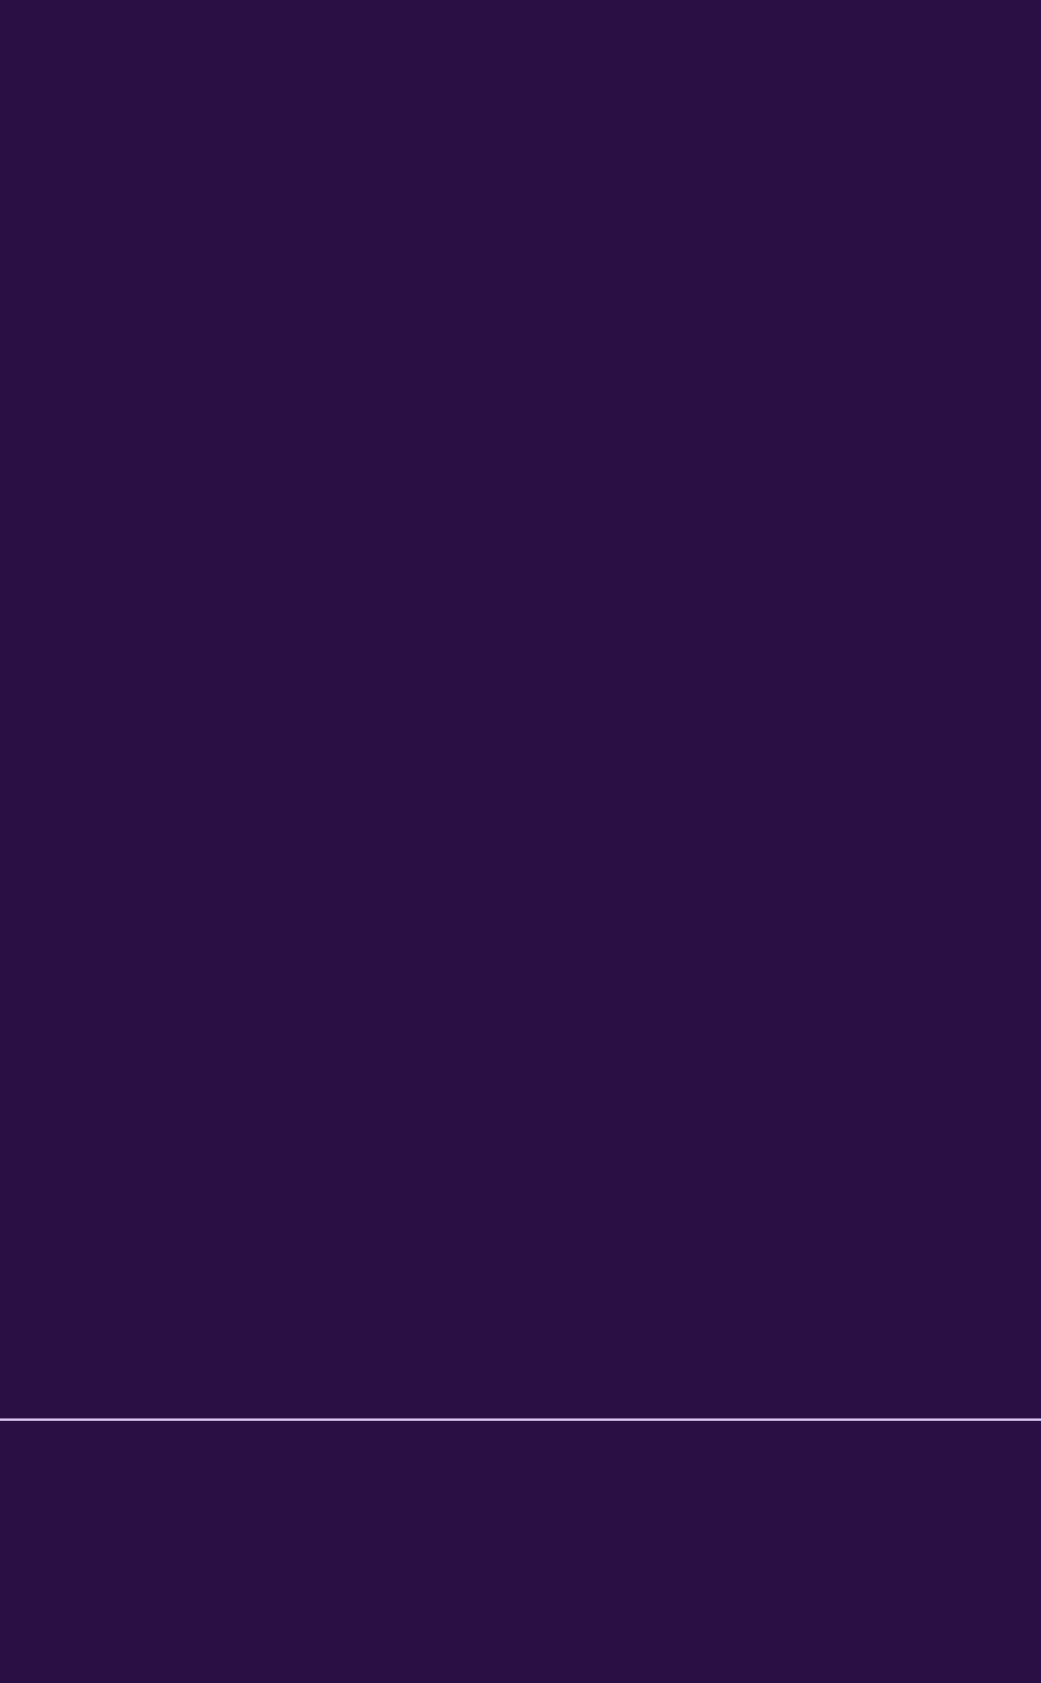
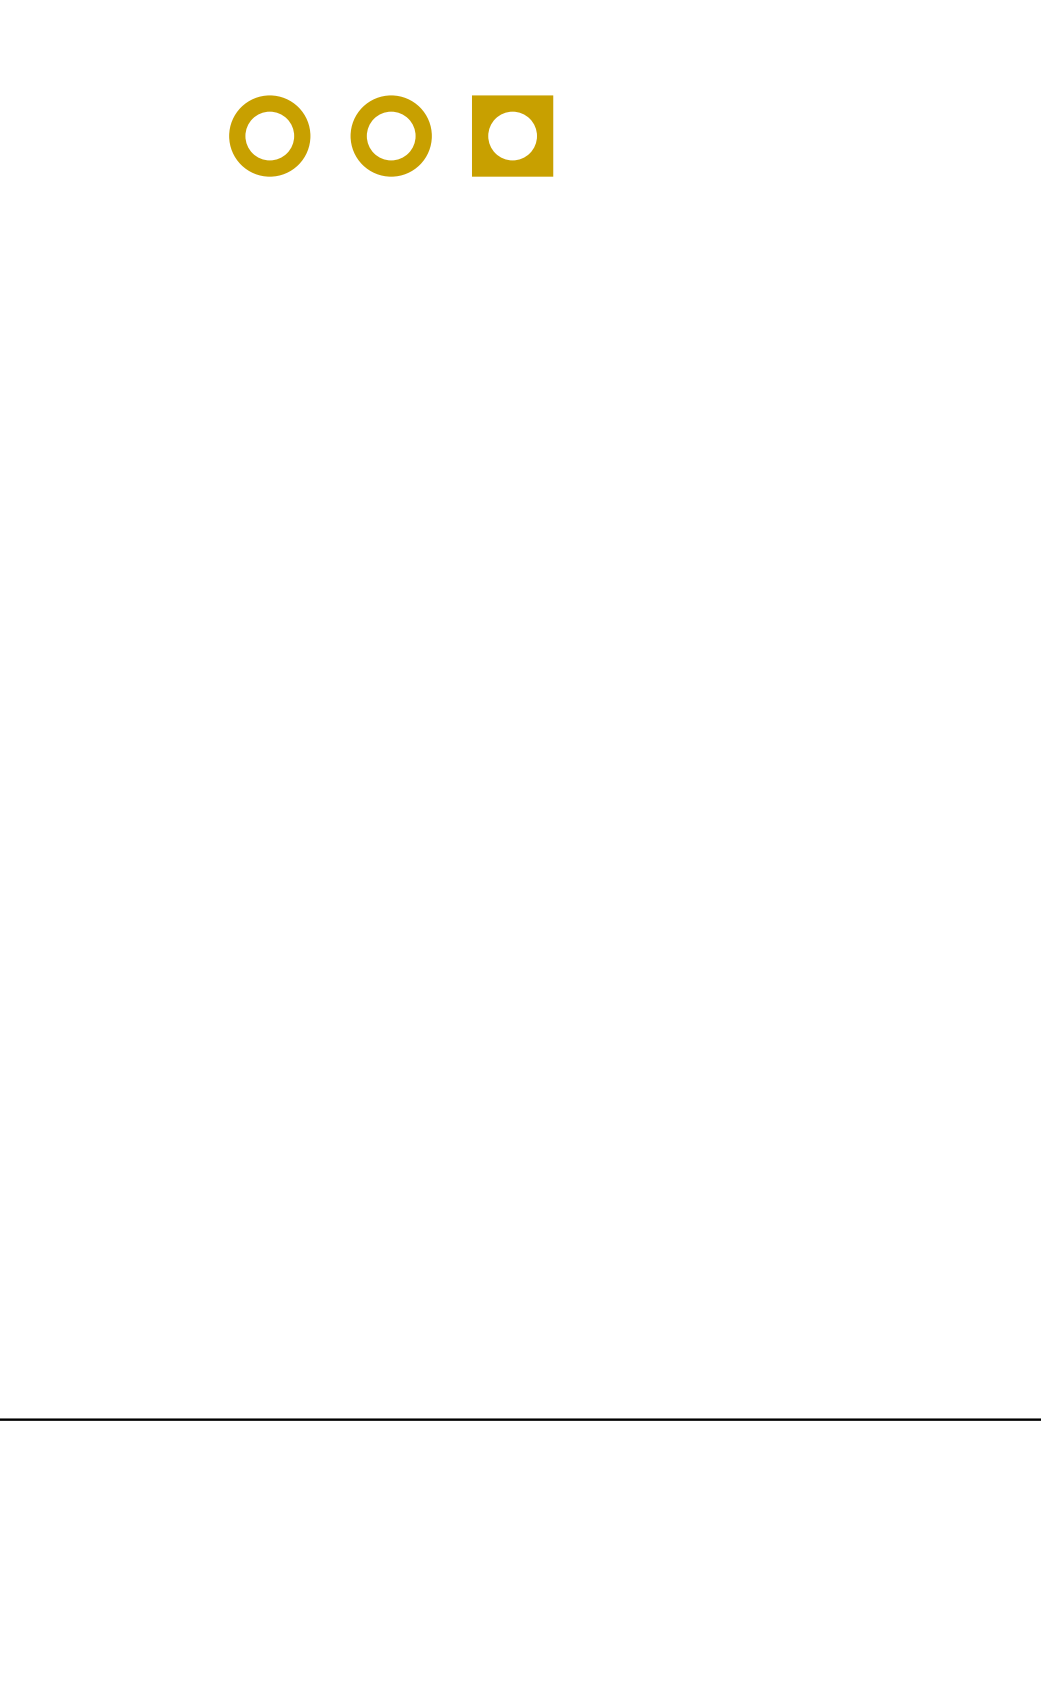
part: none -> (391, 136)

